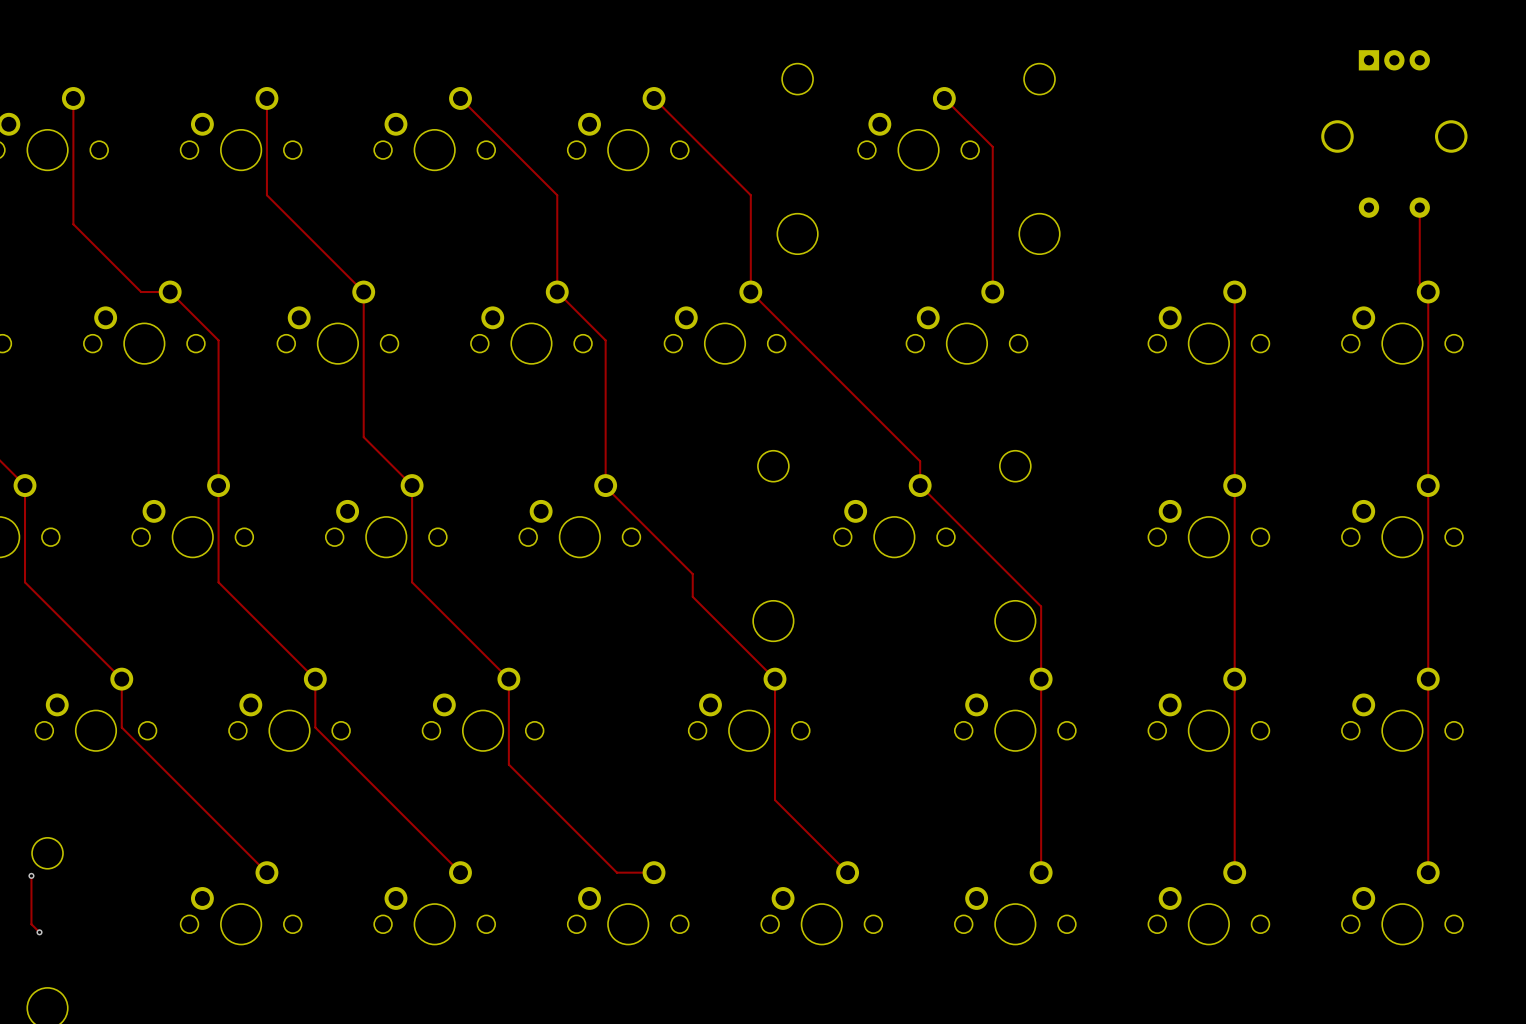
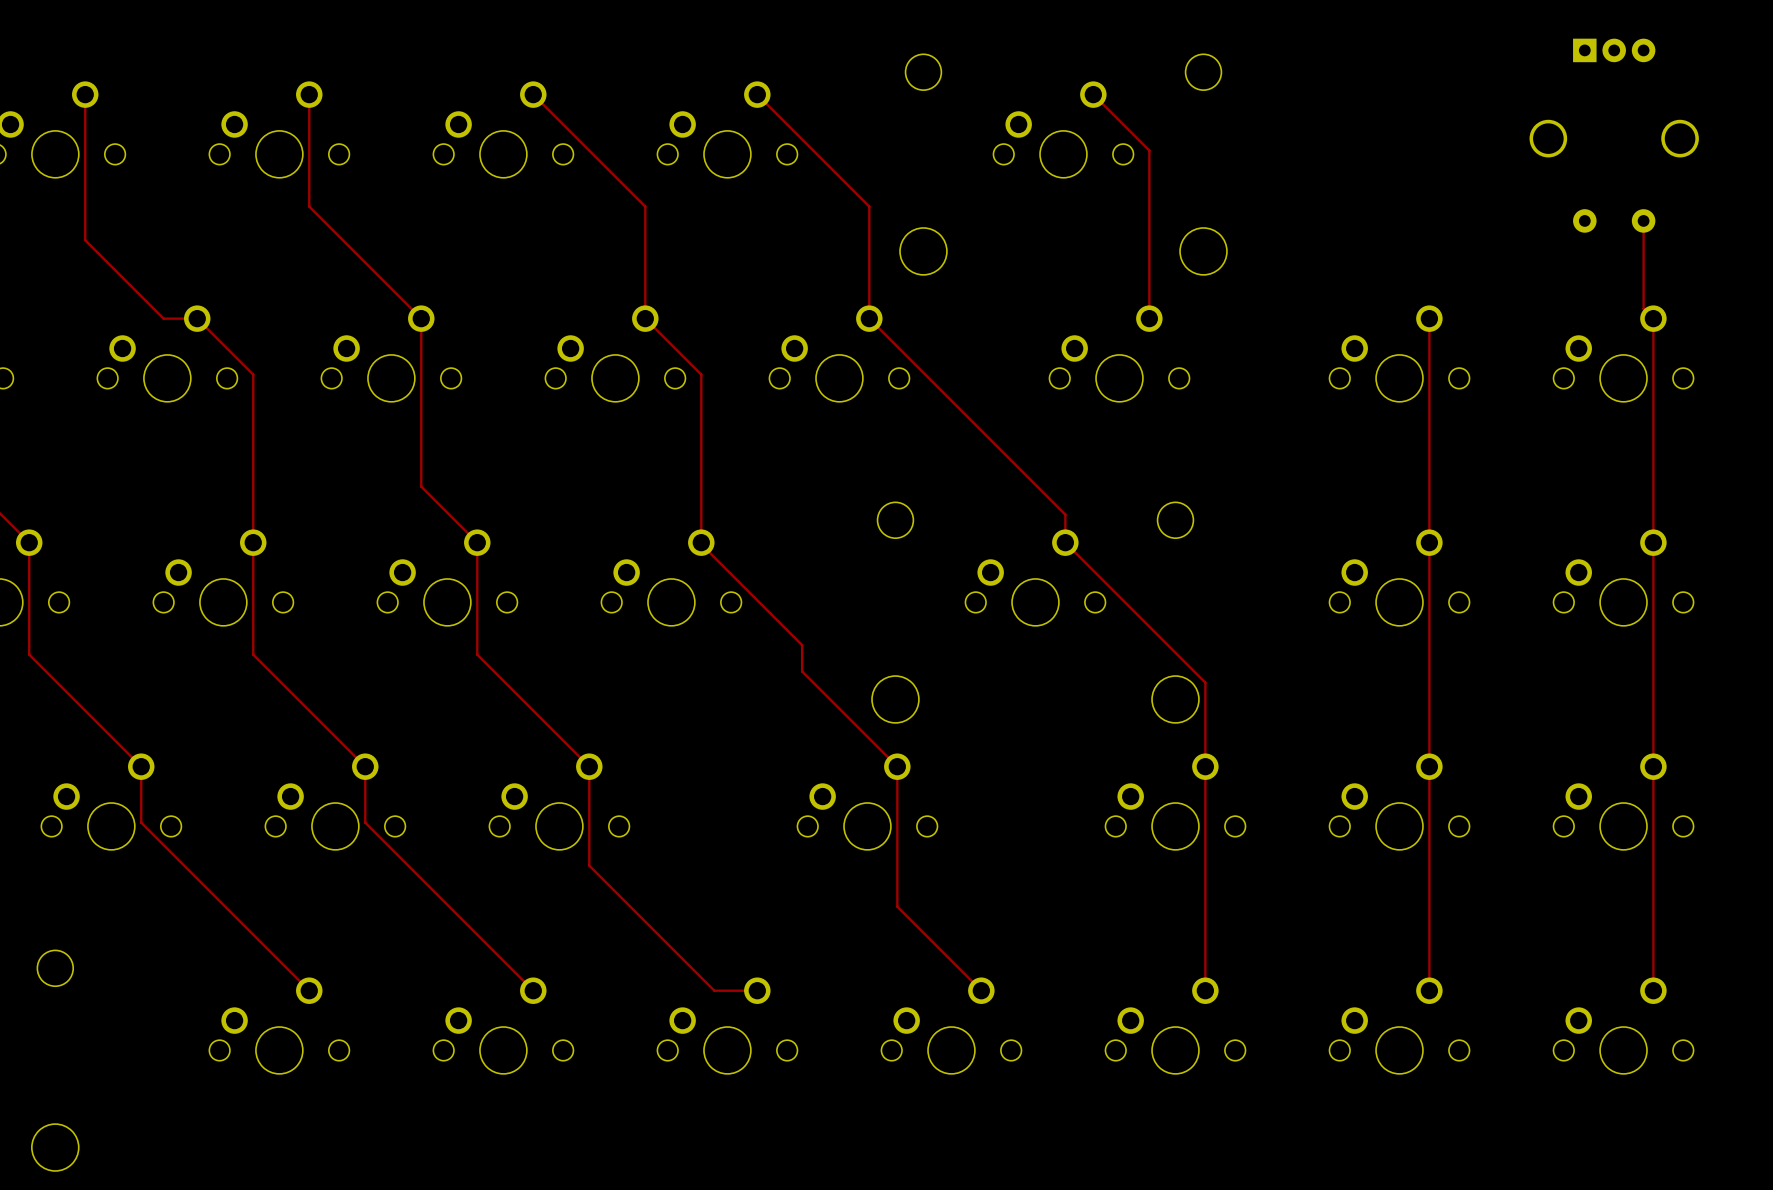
track: (31, 875) (31, 924) (39, 932) -> none
via: (31, 875) -> none
via: (39, 932) -> none

